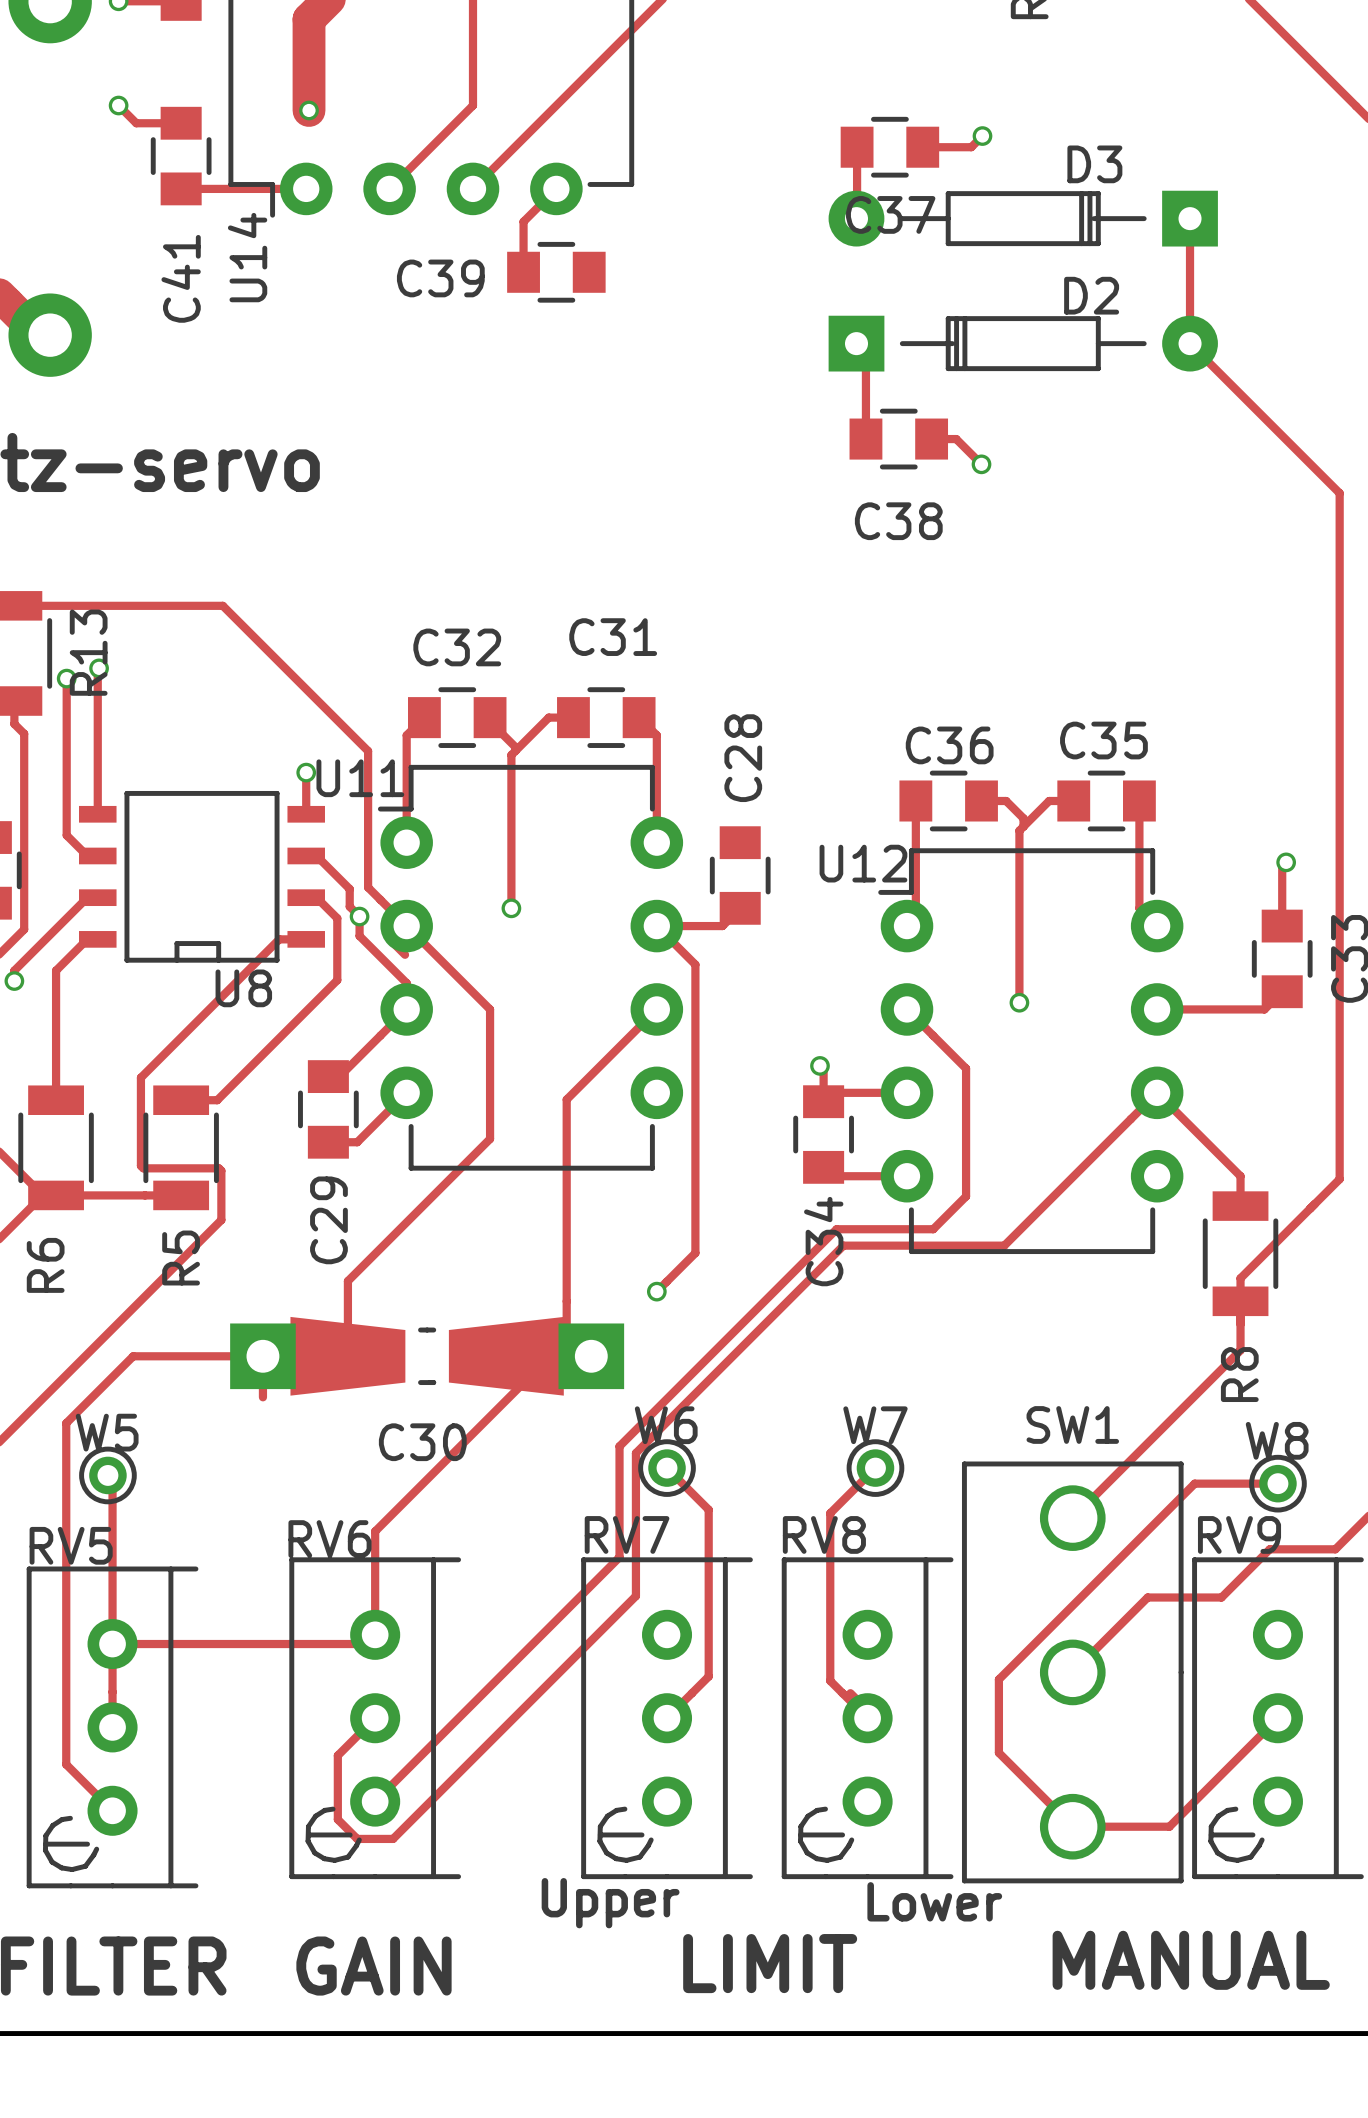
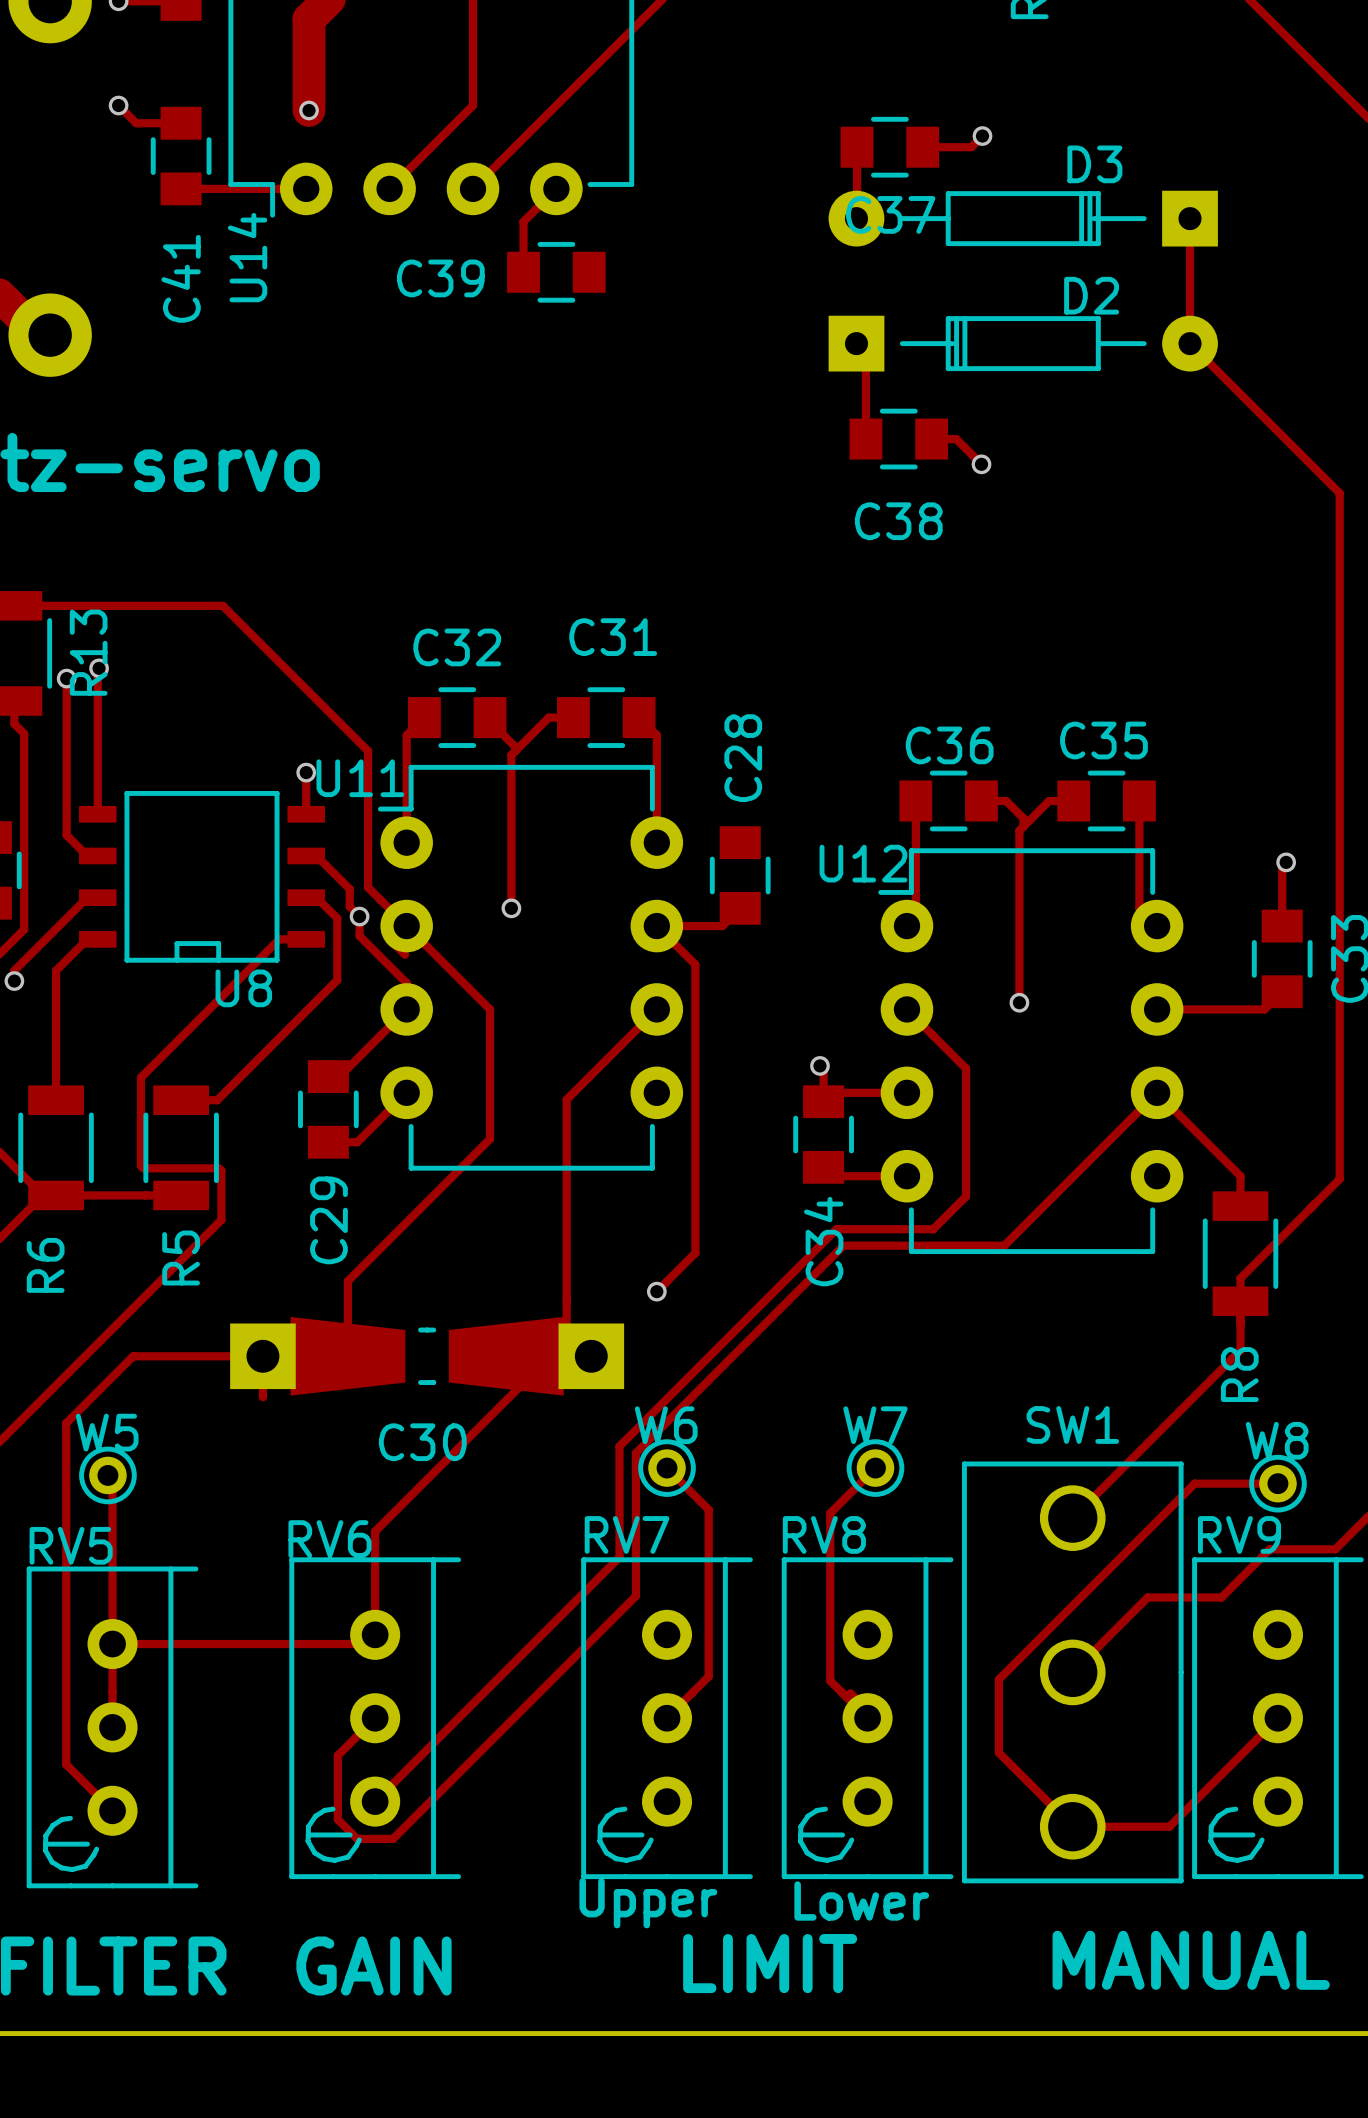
text position: Lower (934, 1901) -> Lower (861, 1900)
text position: Upper (610, 1903) -> Upper (648, 1903)

